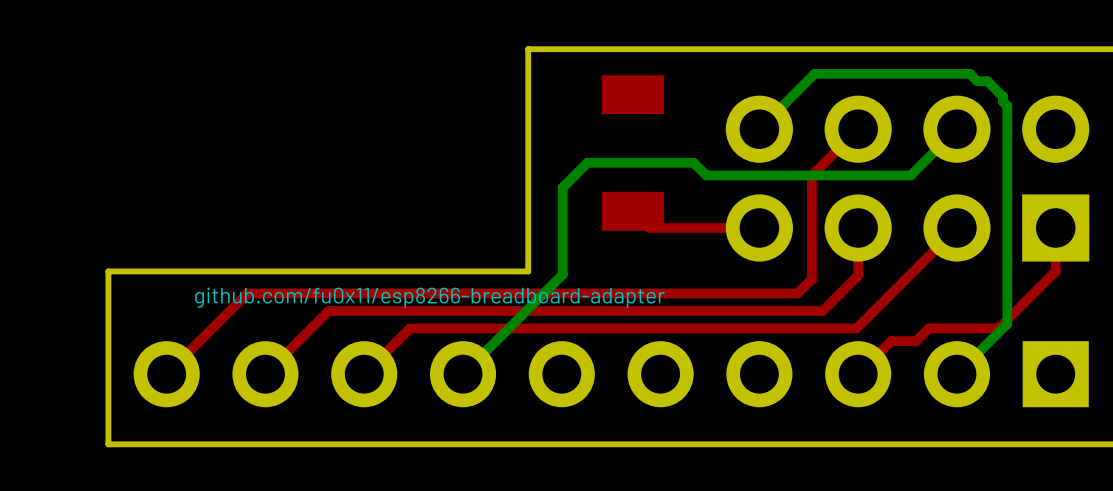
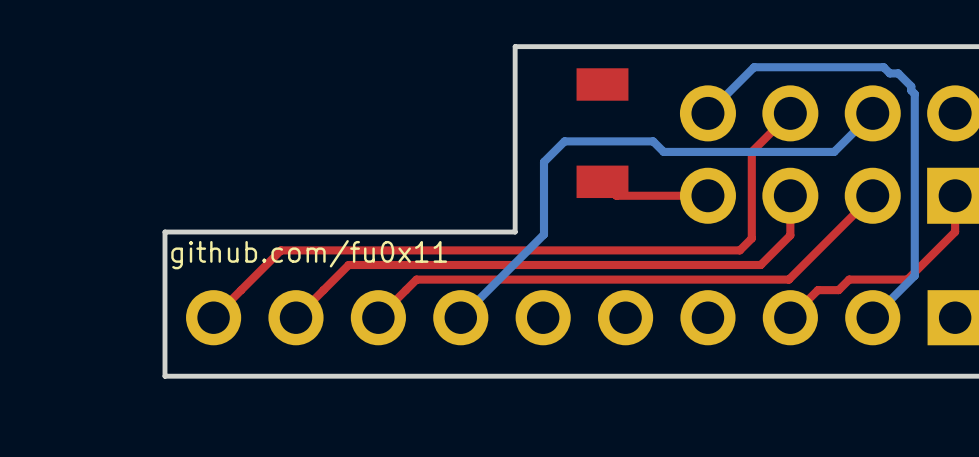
text: github.com/fu0x11/esp8266-breadboard-adapter (429, 297) -> none
text: none -> github.com/fu0x11 (309, 254)

